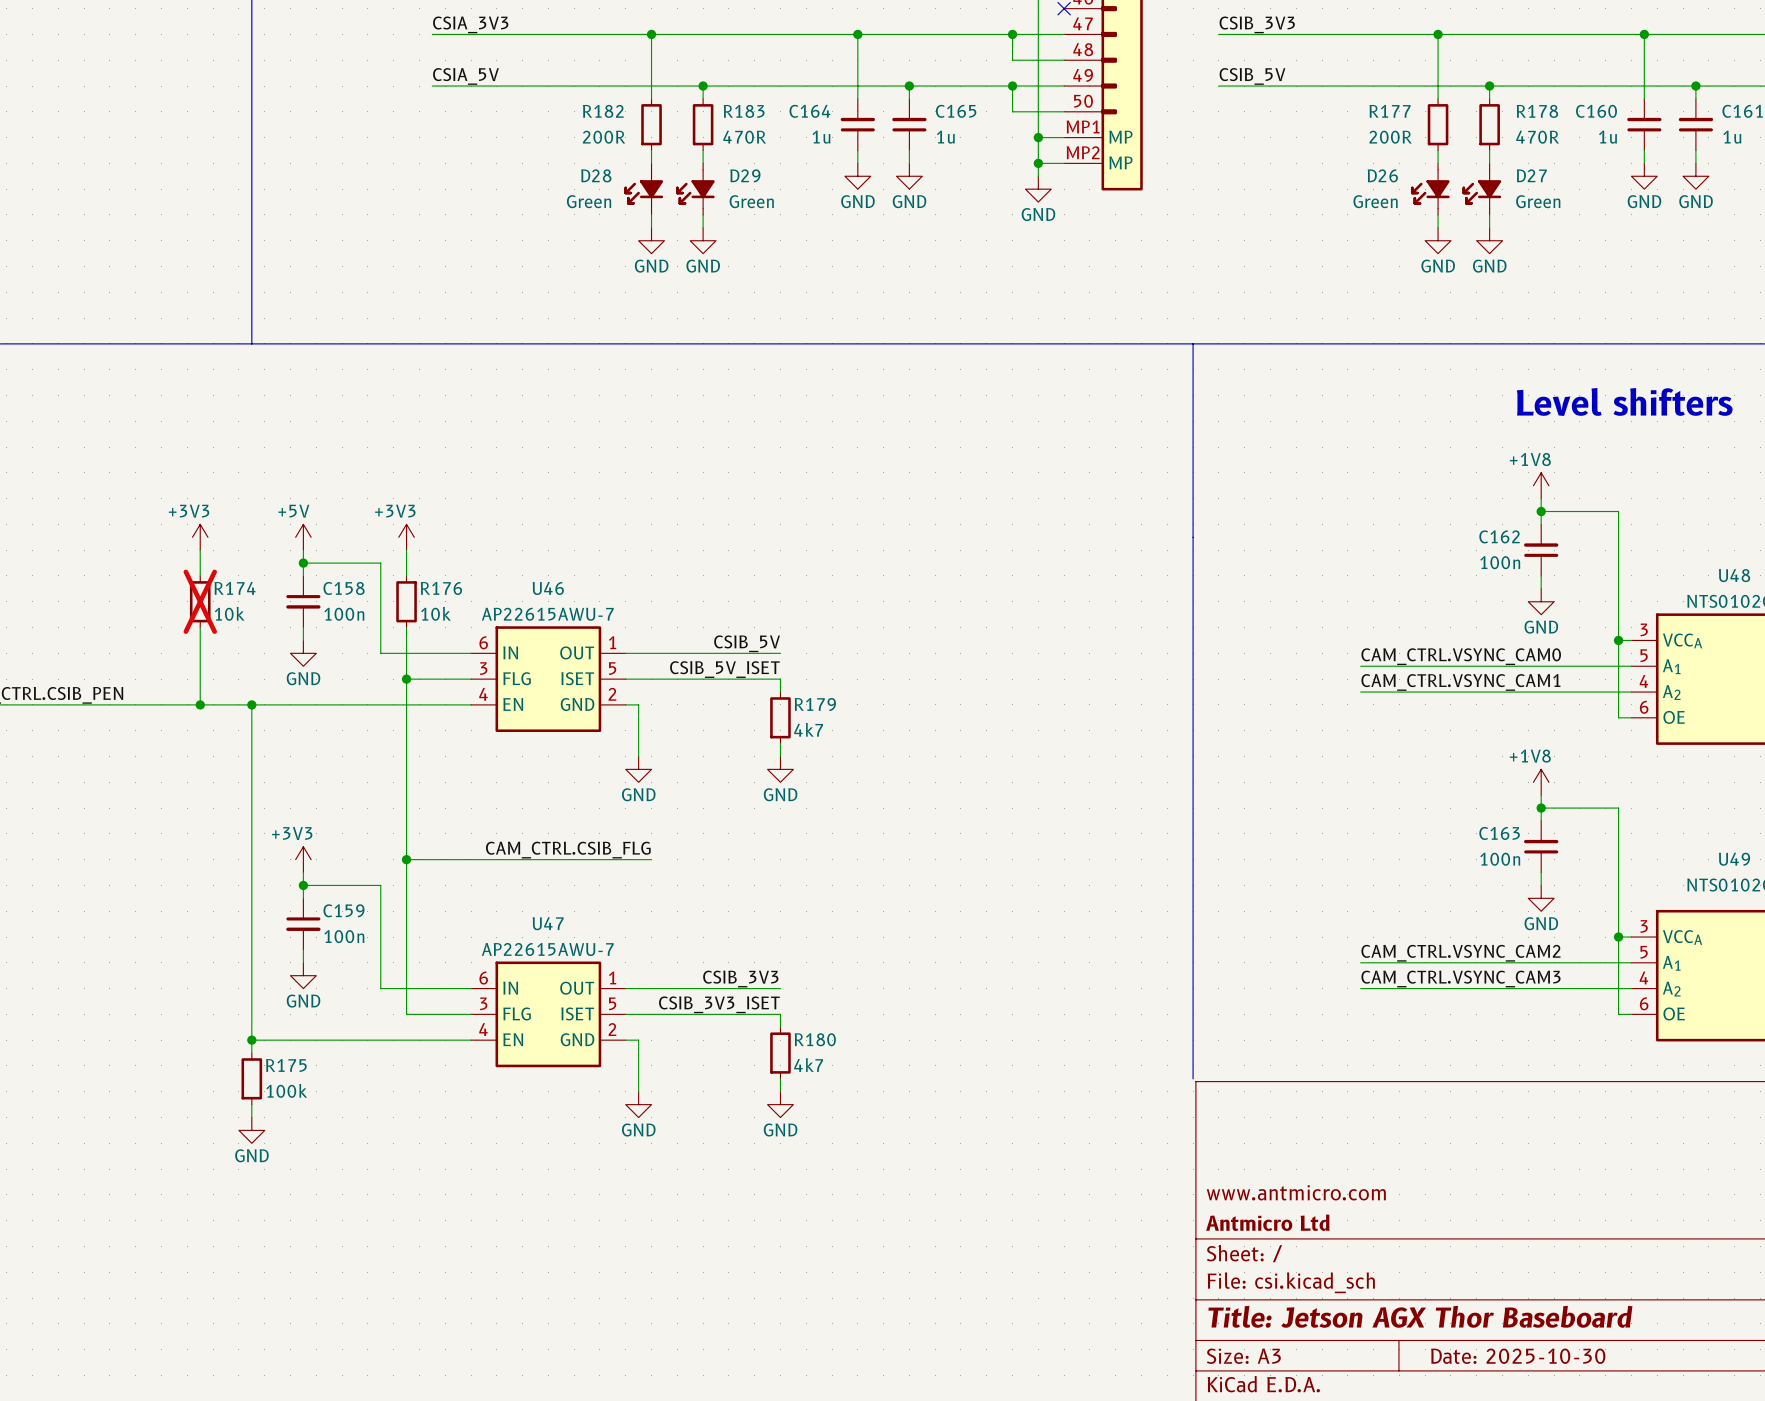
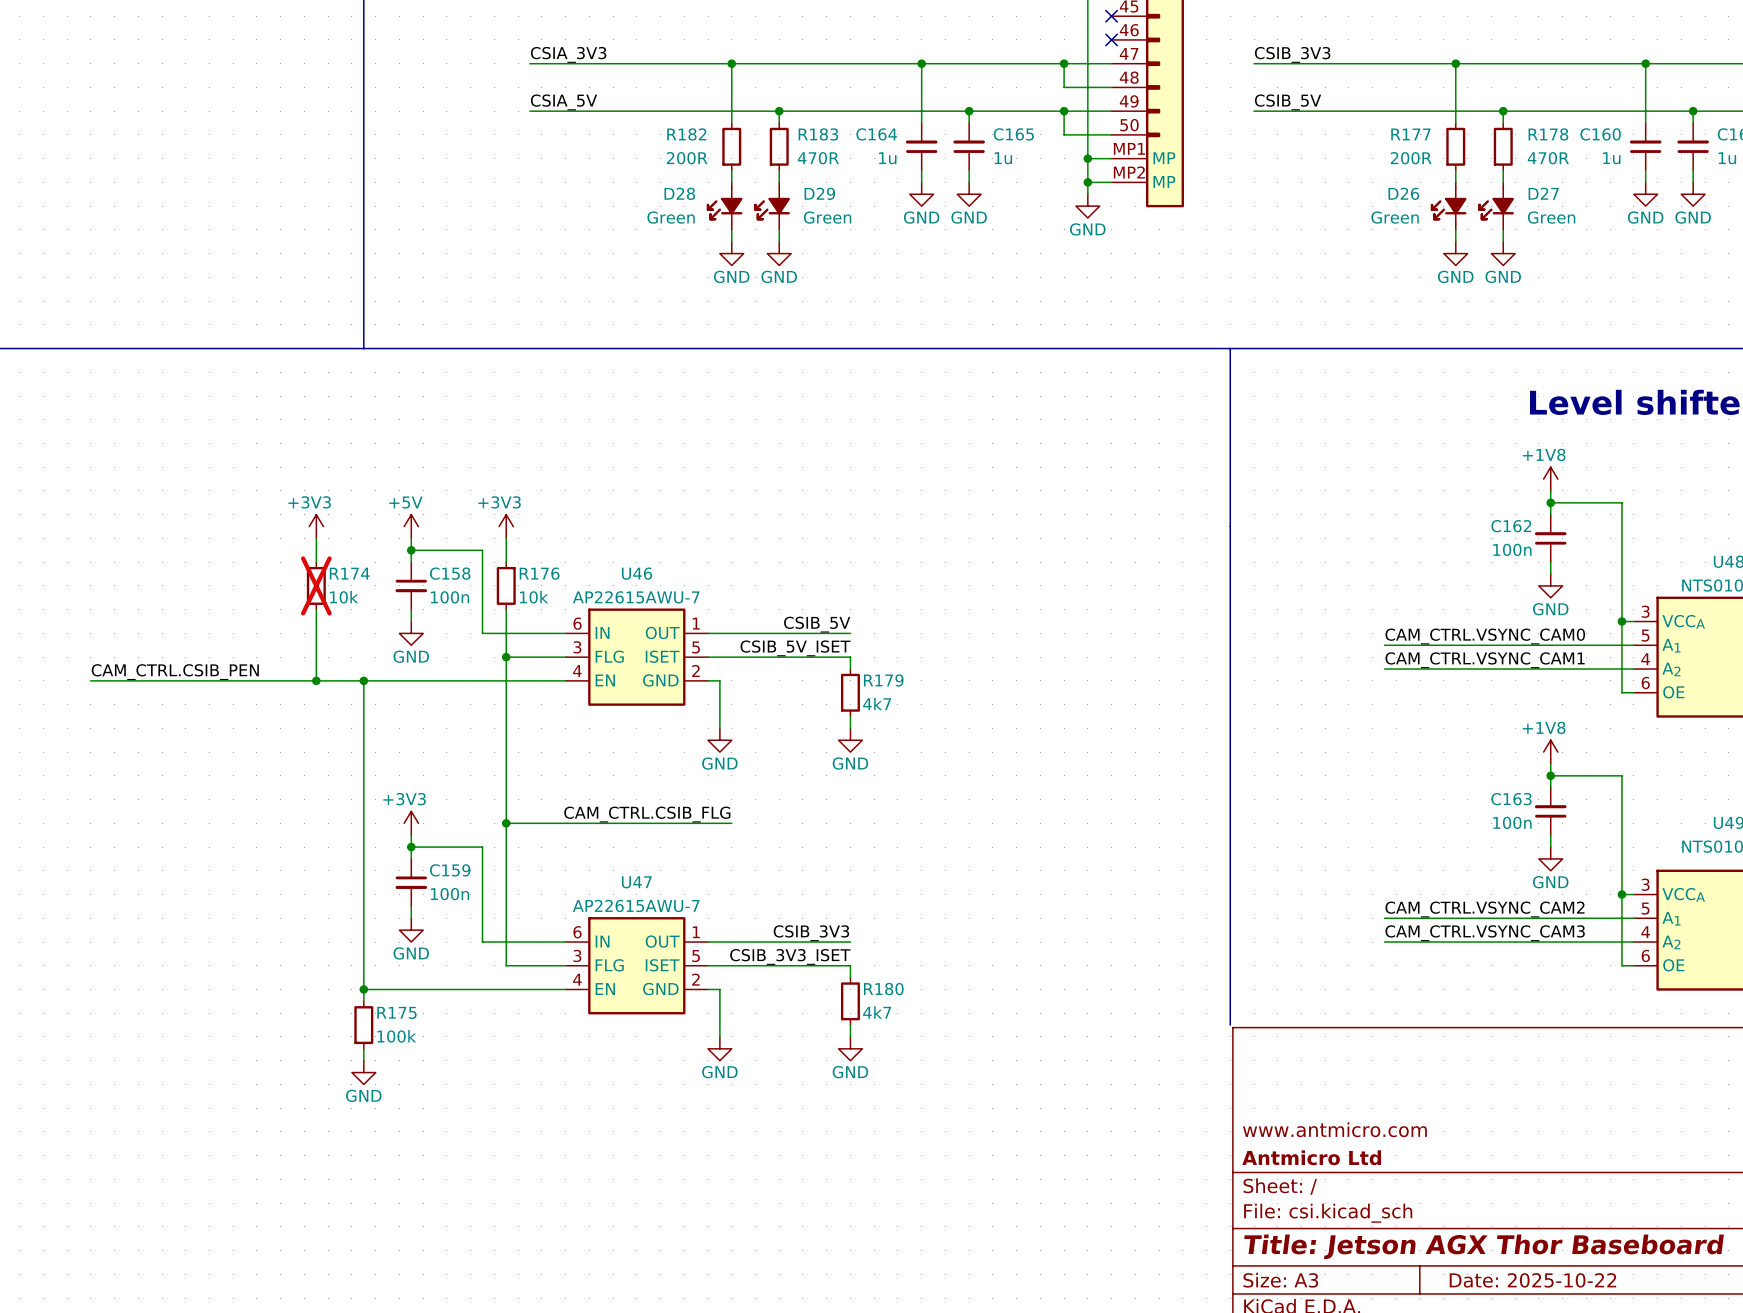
title block: Date: 2025-10-30 (1518, 1356) -> Date: 2025-10-22 (1532, 1280)

